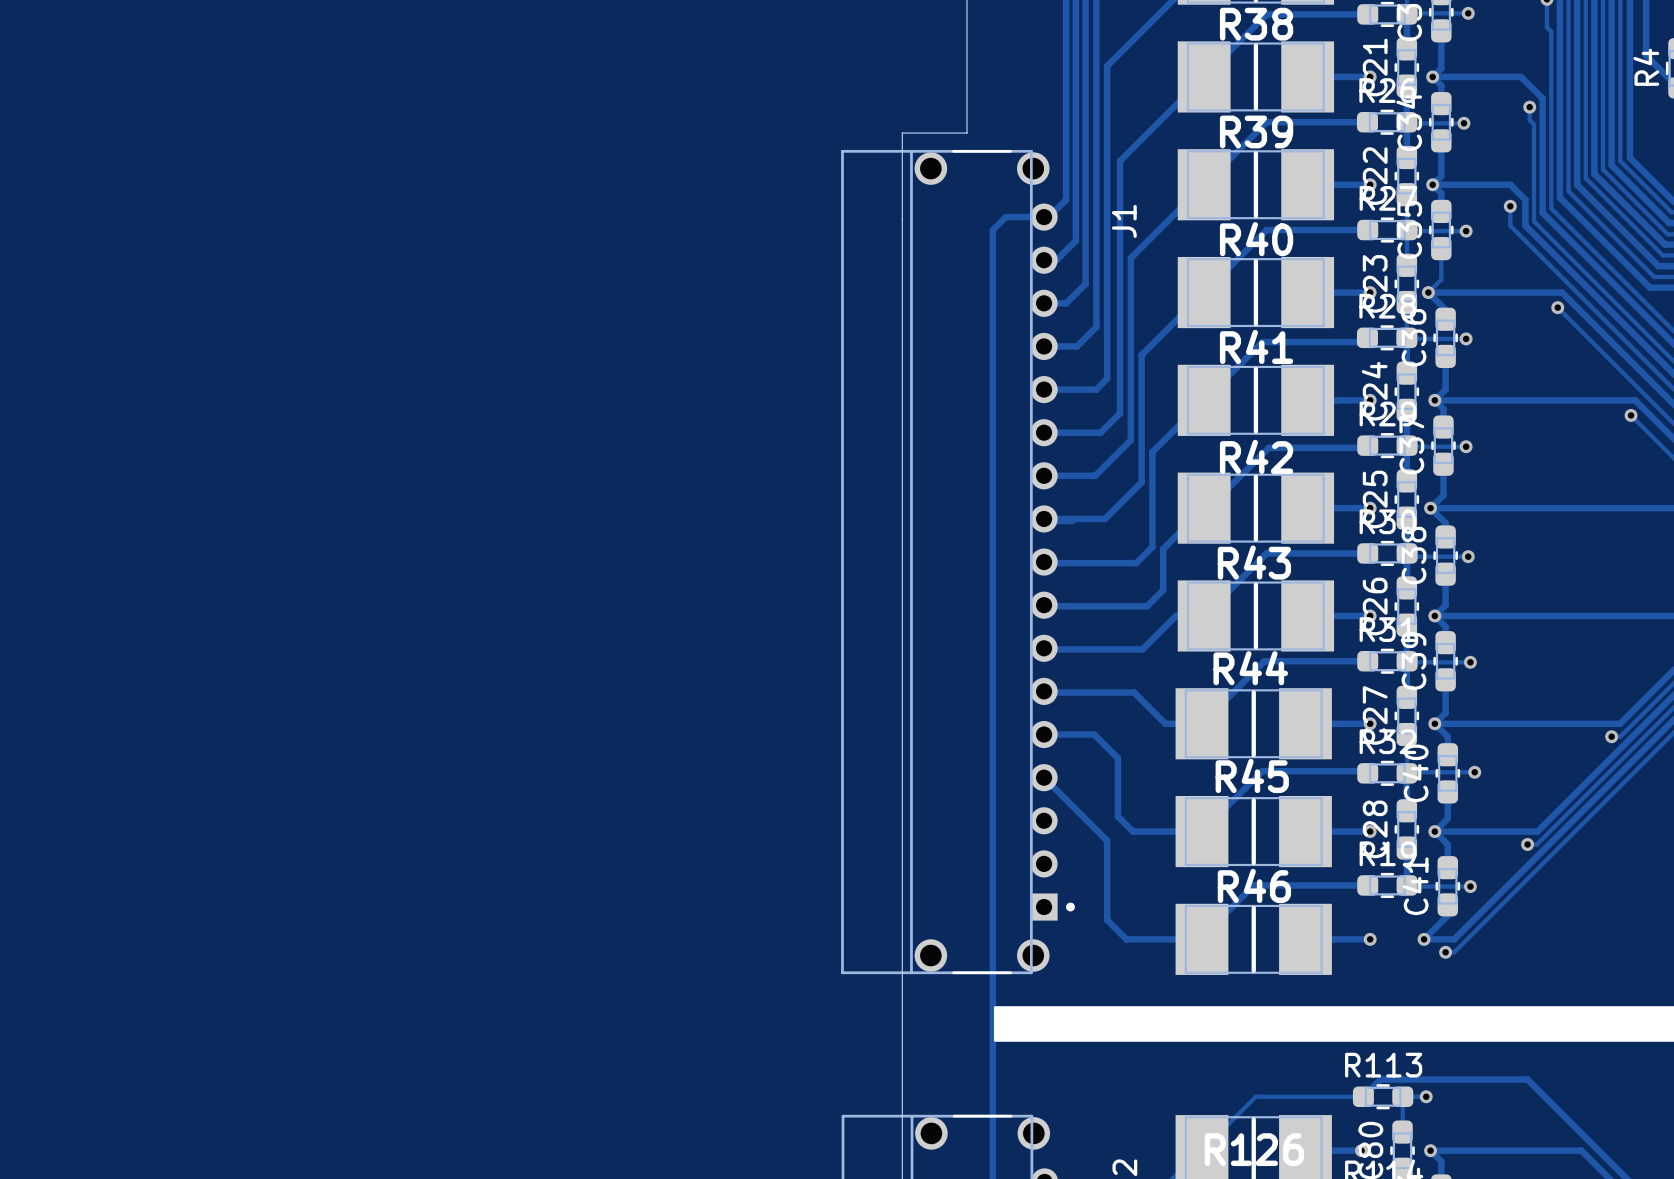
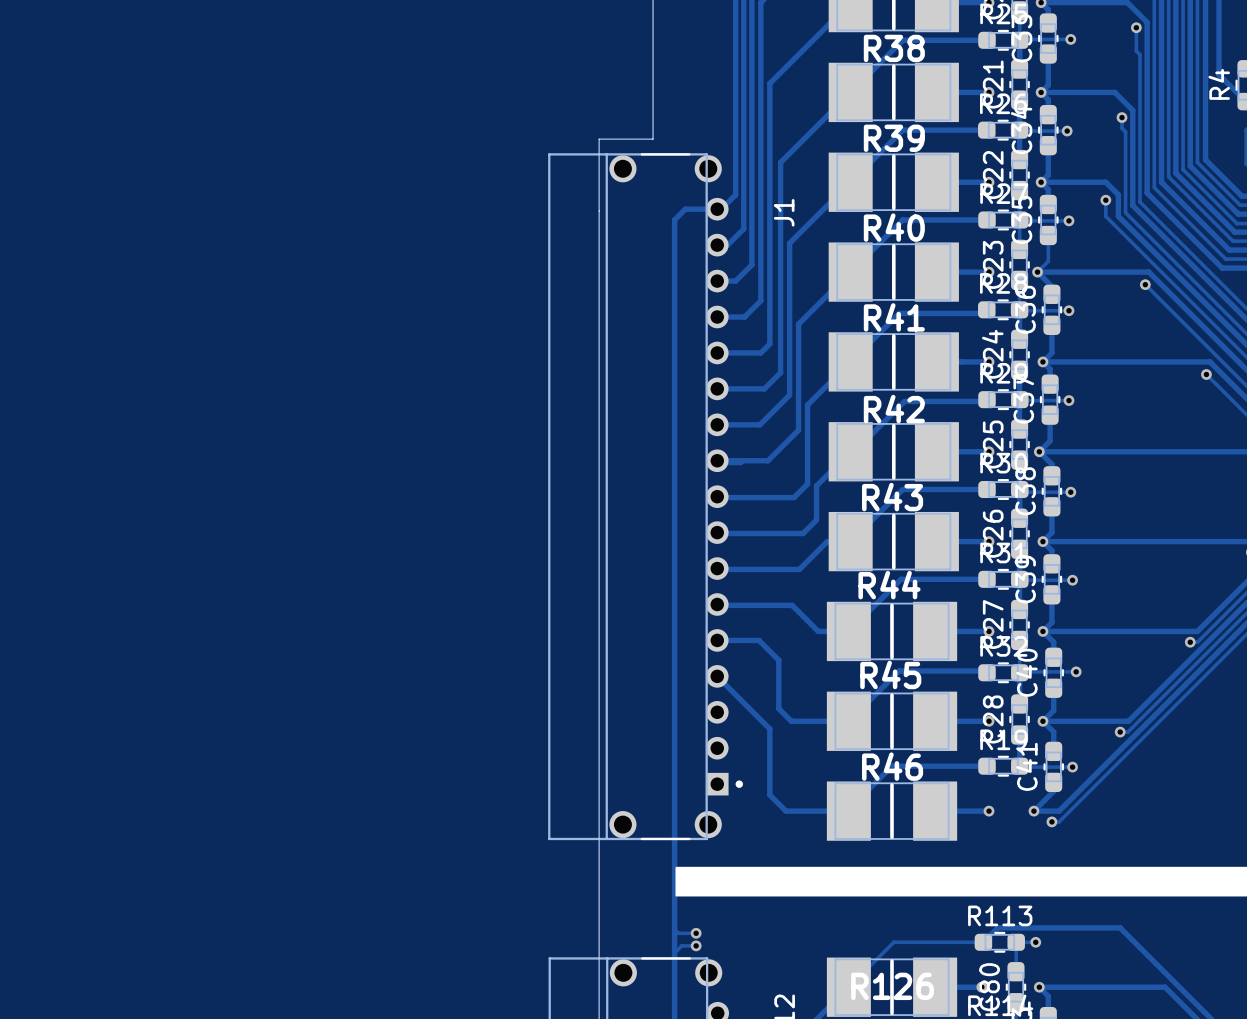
track: none -> (674, 929) (678, 933) (696, 933)
via: none -> (696, 933)
track: none -> (696, 945) (681, 945) (674, 953)
via: none -> (696, 945)

